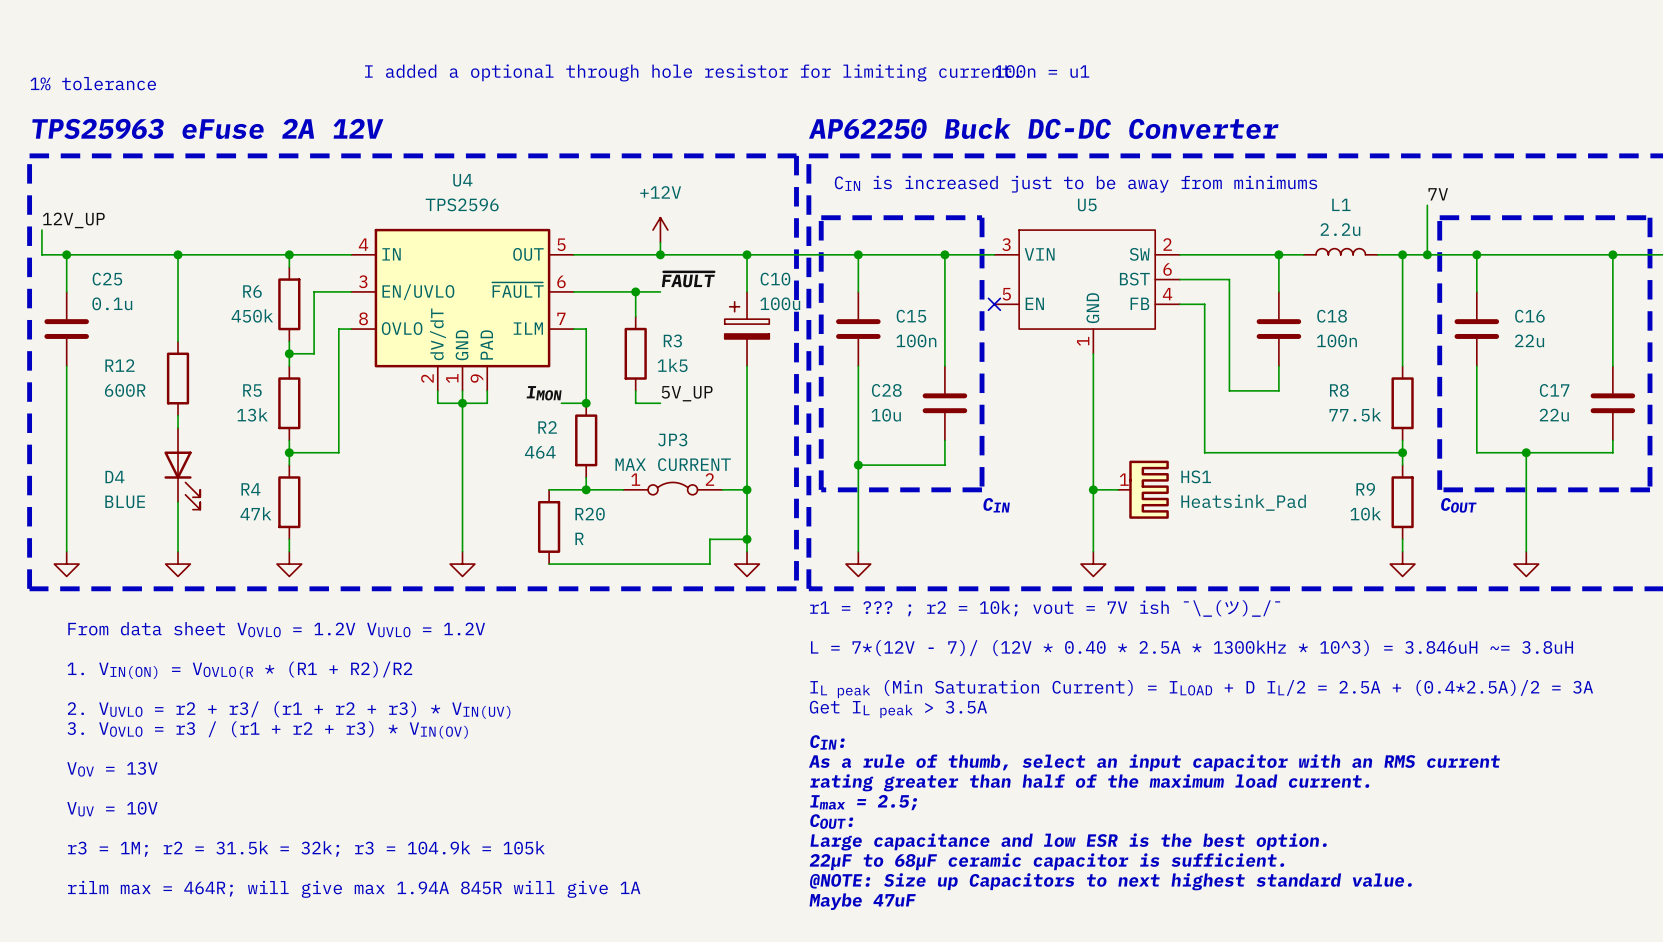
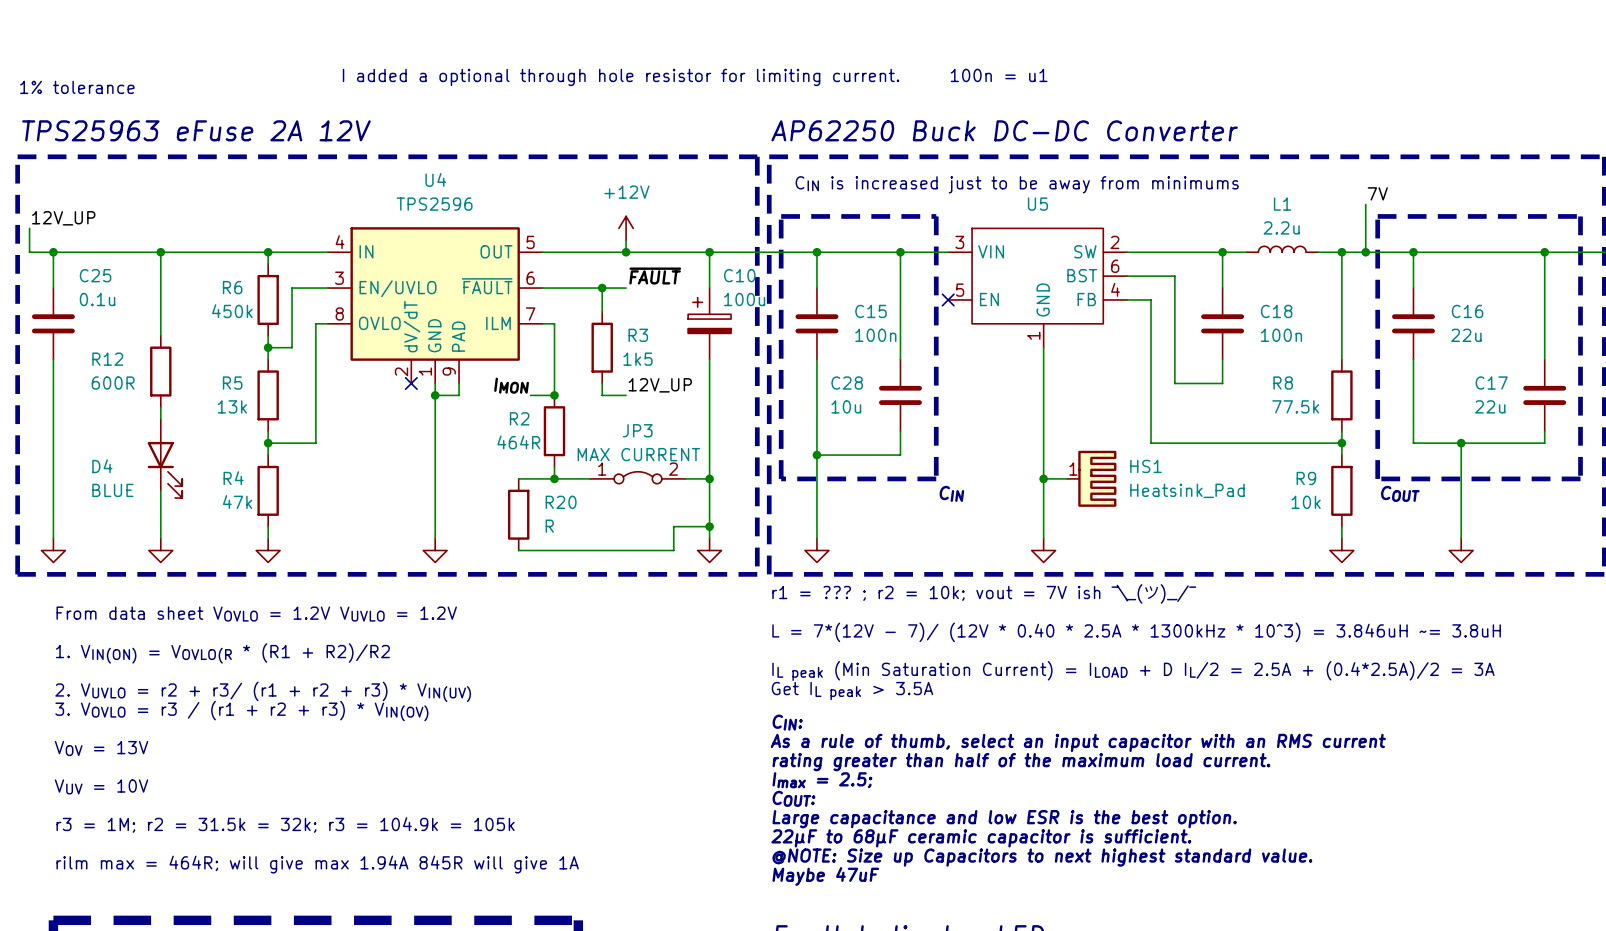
wire: (437, 390) (437, 403) (462, 403) -> none
no-connect mark: none -> (411, 383)
label: 5V_UP (687, 393) -> 12V_UP (660, 385)
R2 value: 464 (540, 452) -> 464R (518, 442)

